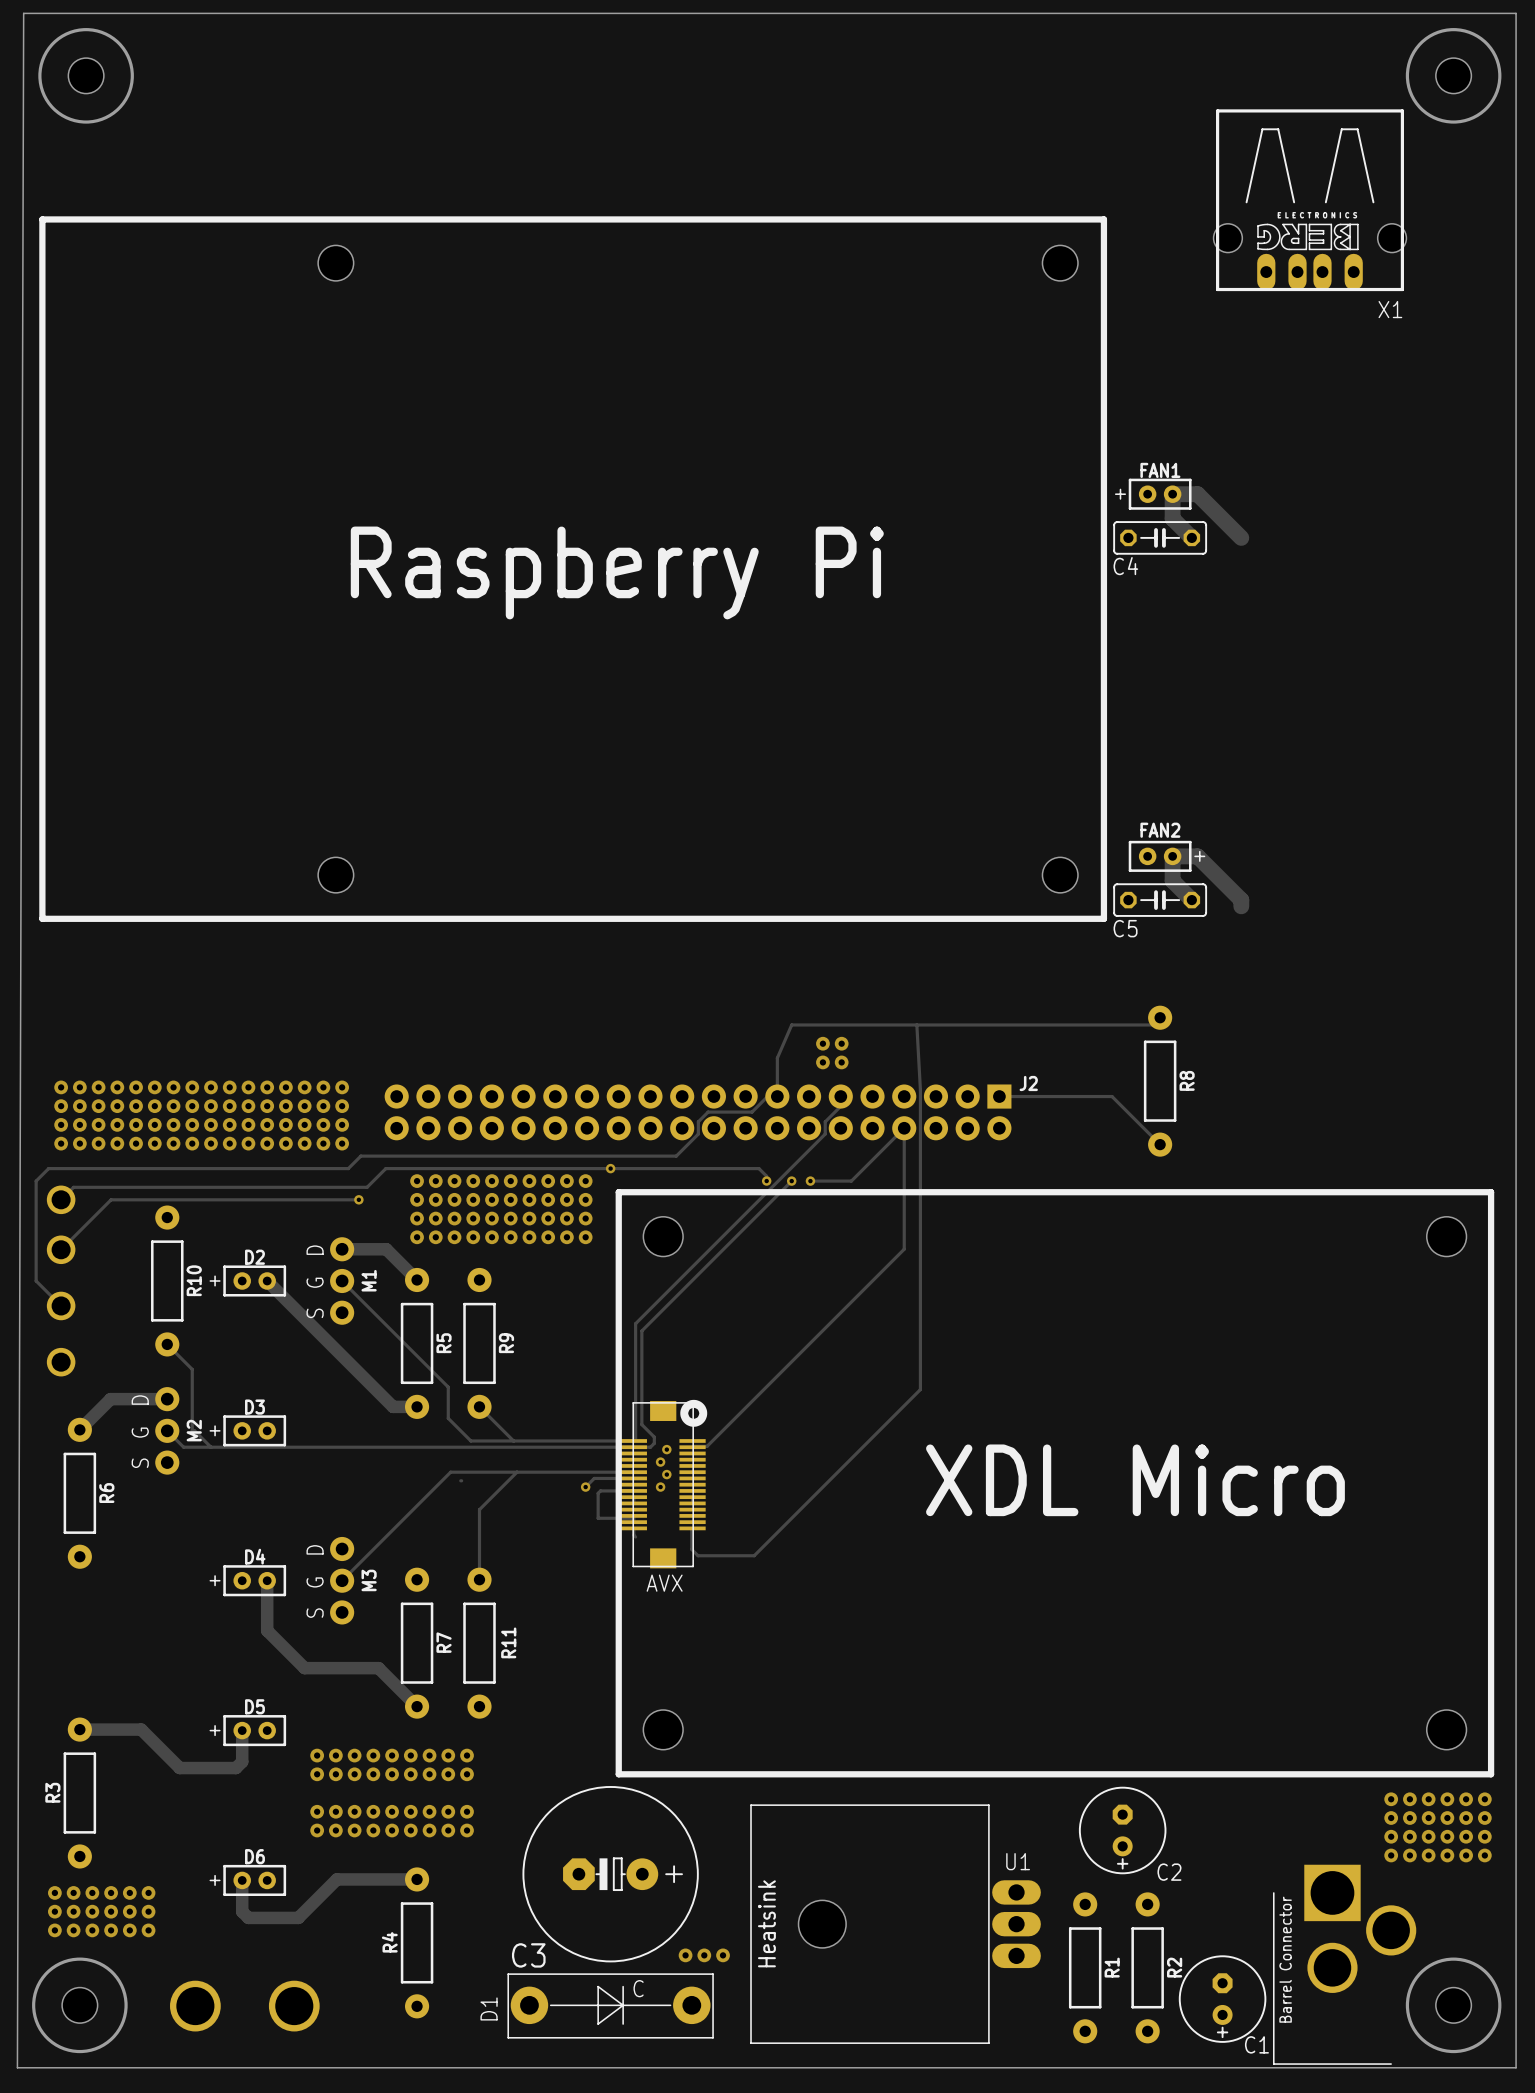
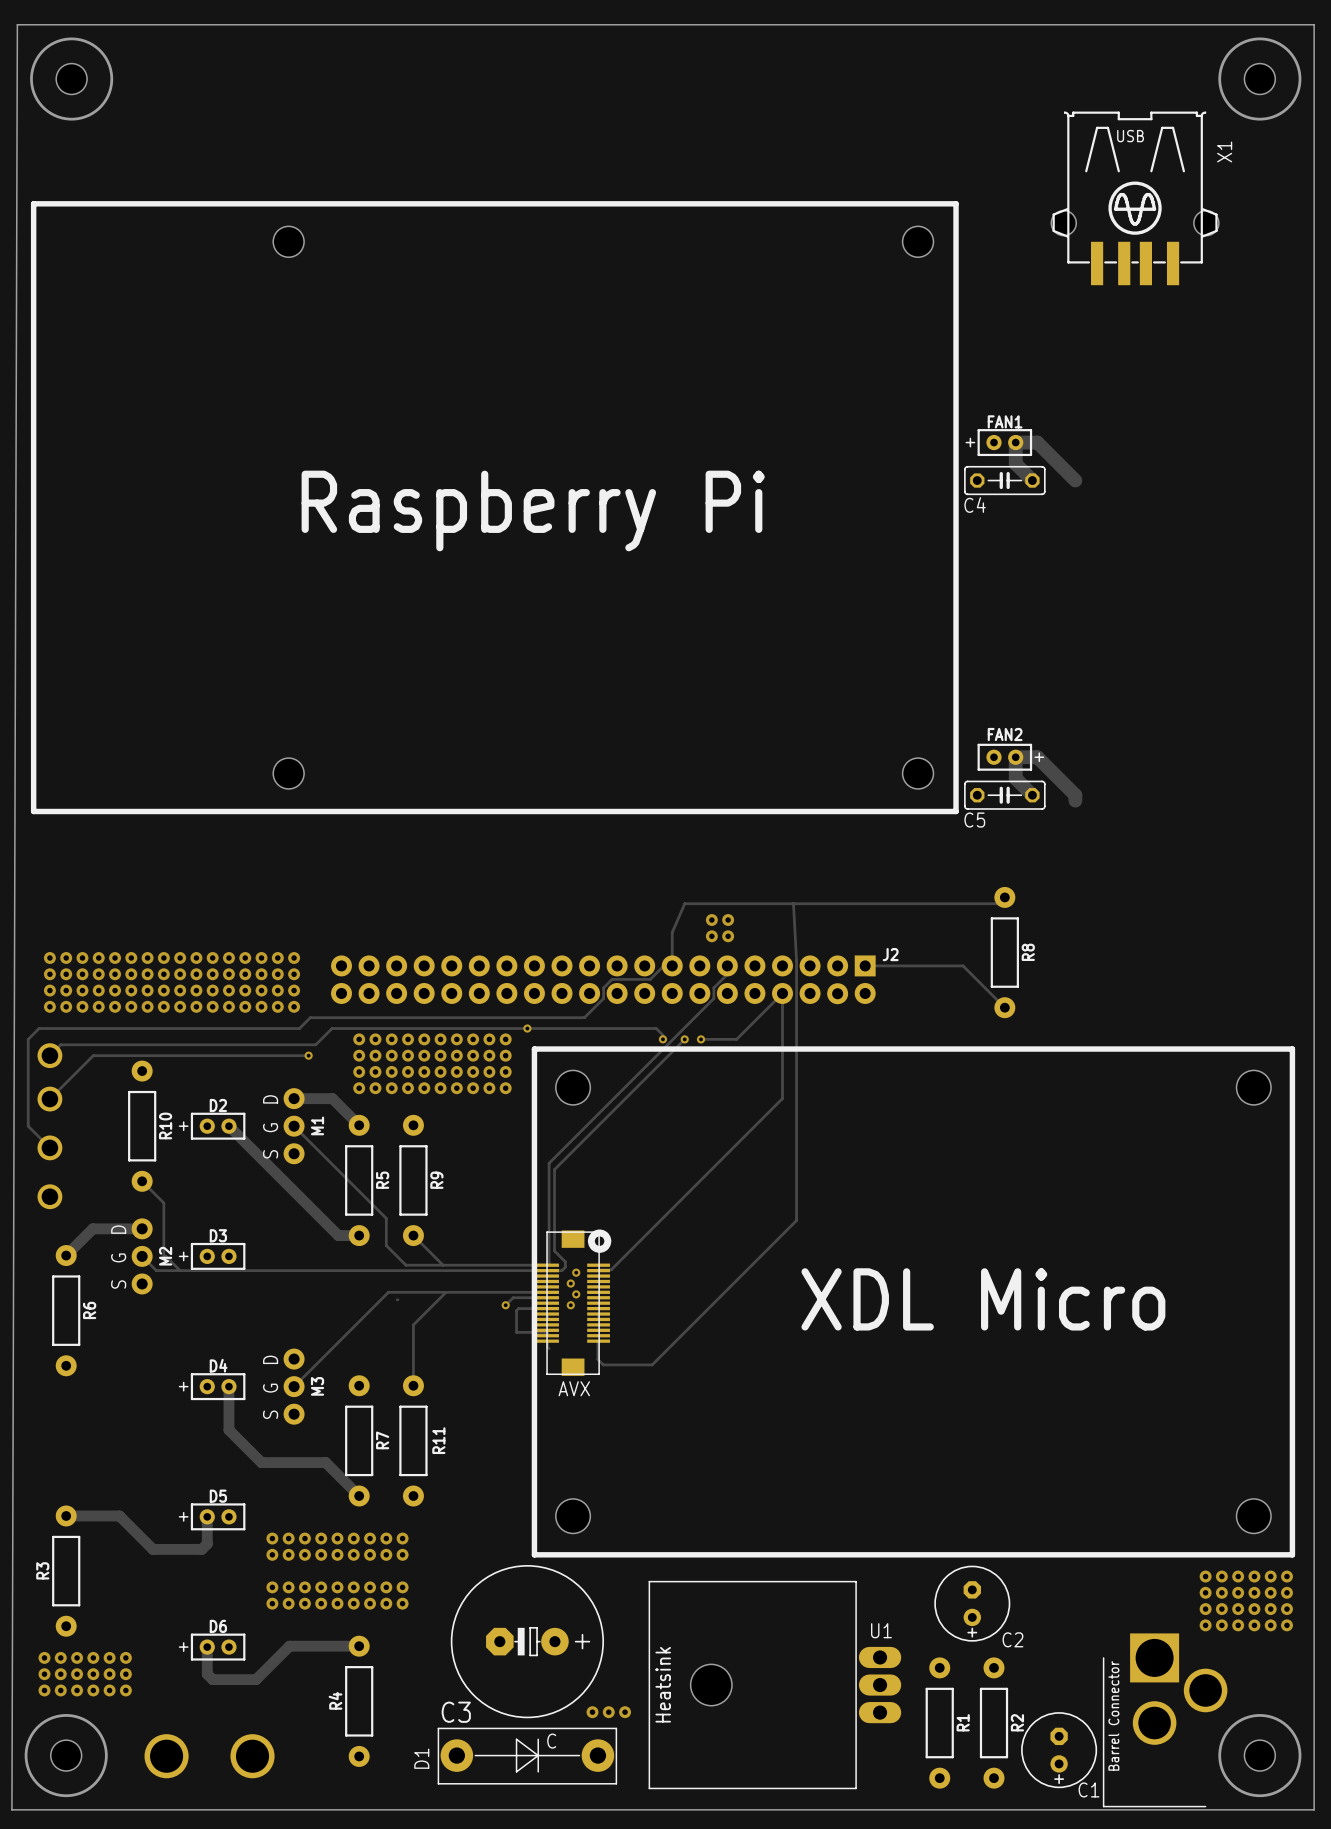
X1 footprint: [1213, 109, 1407, 292] -> [1051, 111, 1219, 286]
X1 name position: X1 (1390, 309) -> X1 (1224, 151)

